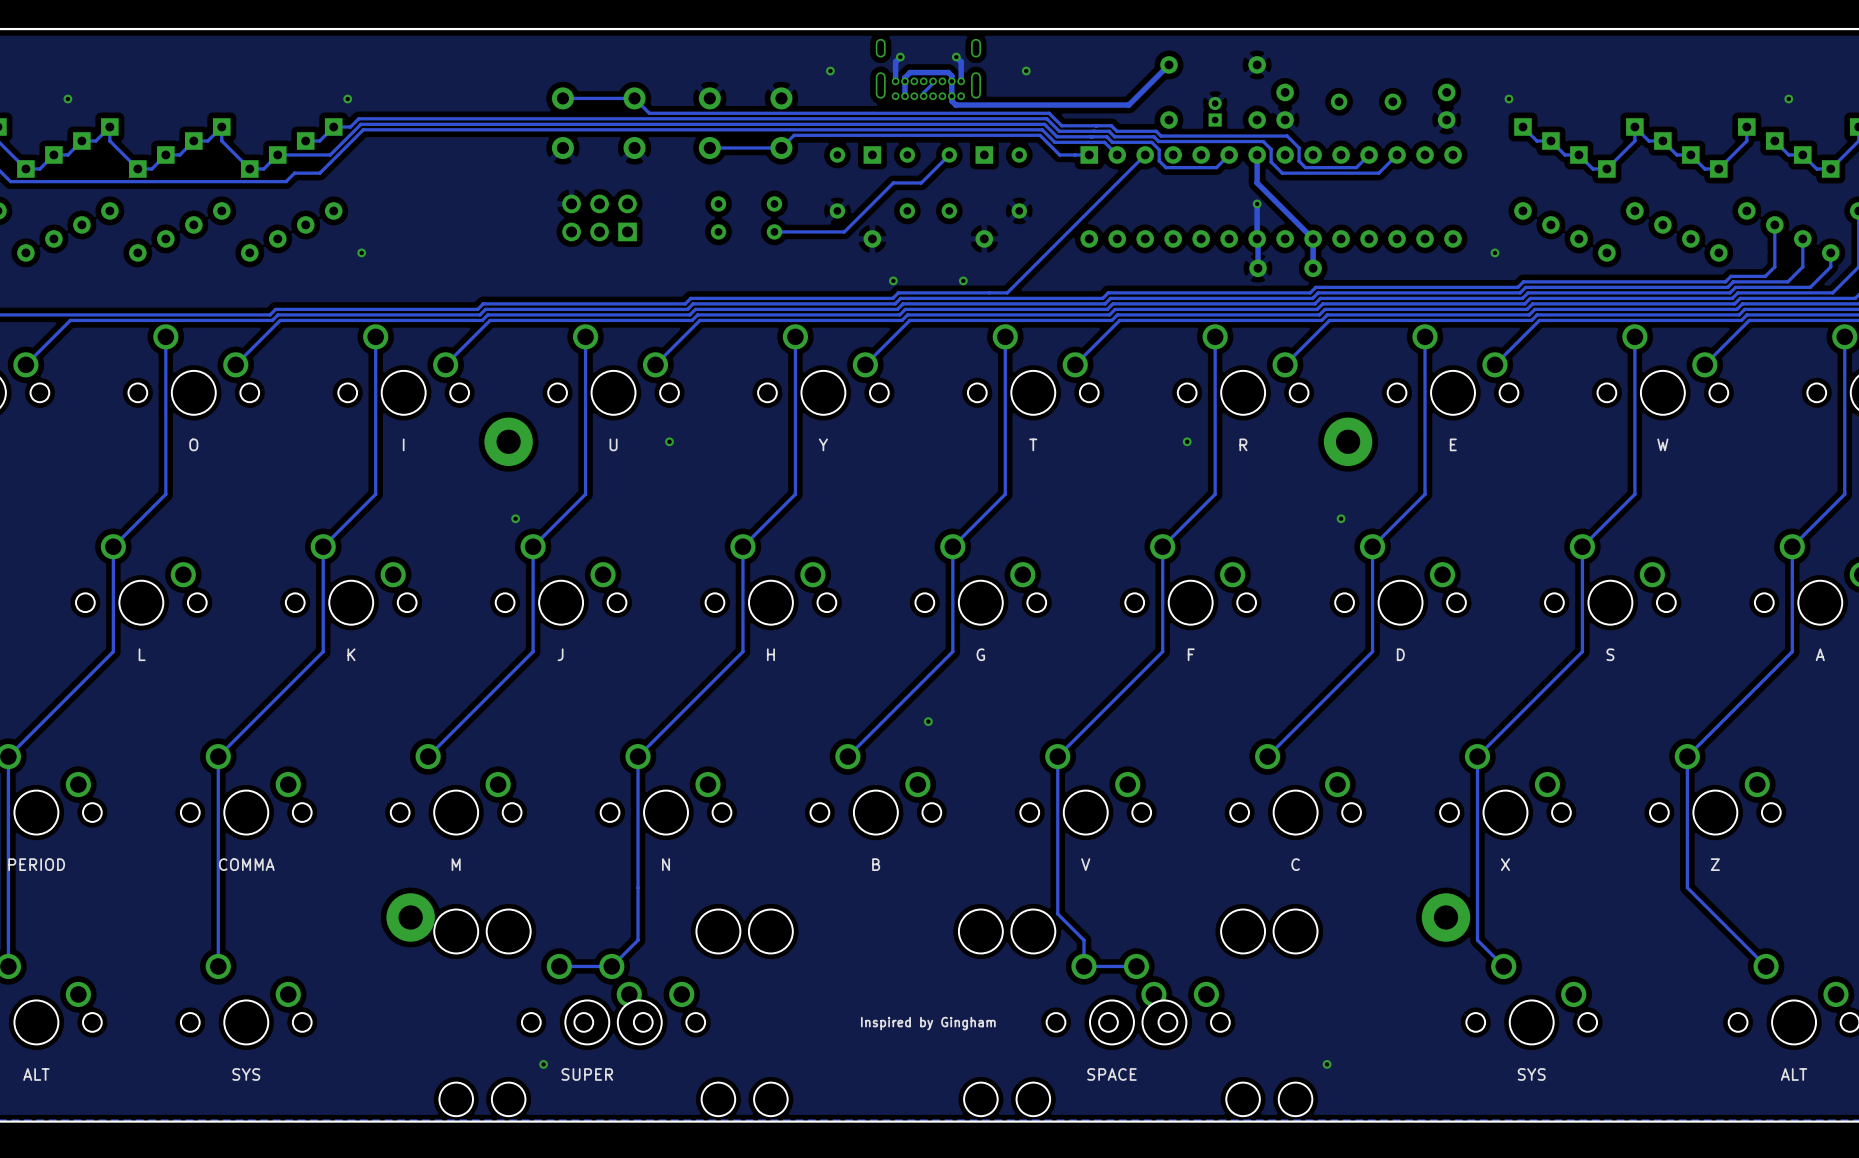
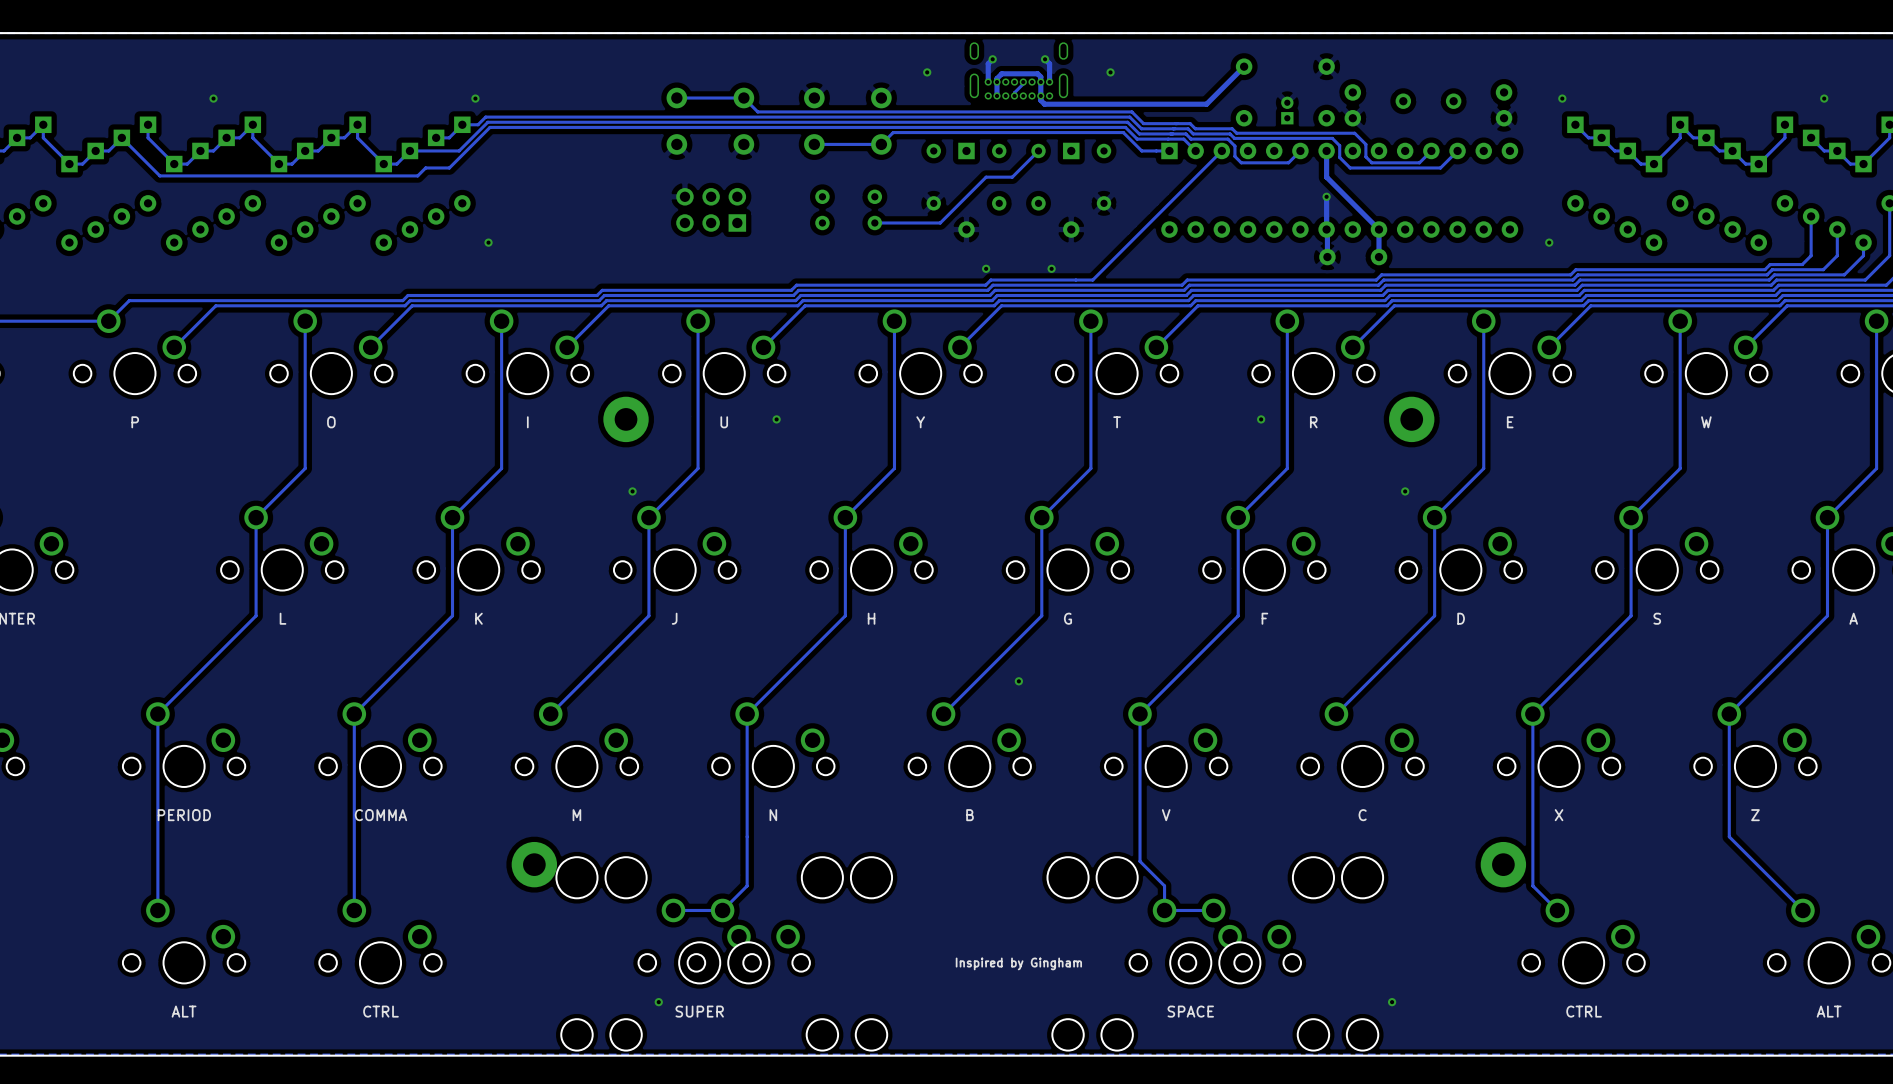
text: SYS (246, 1074) -> CTRL (380, 1011)
text: SYS (1531, 1074) -> CTRL (1584, 1011)

